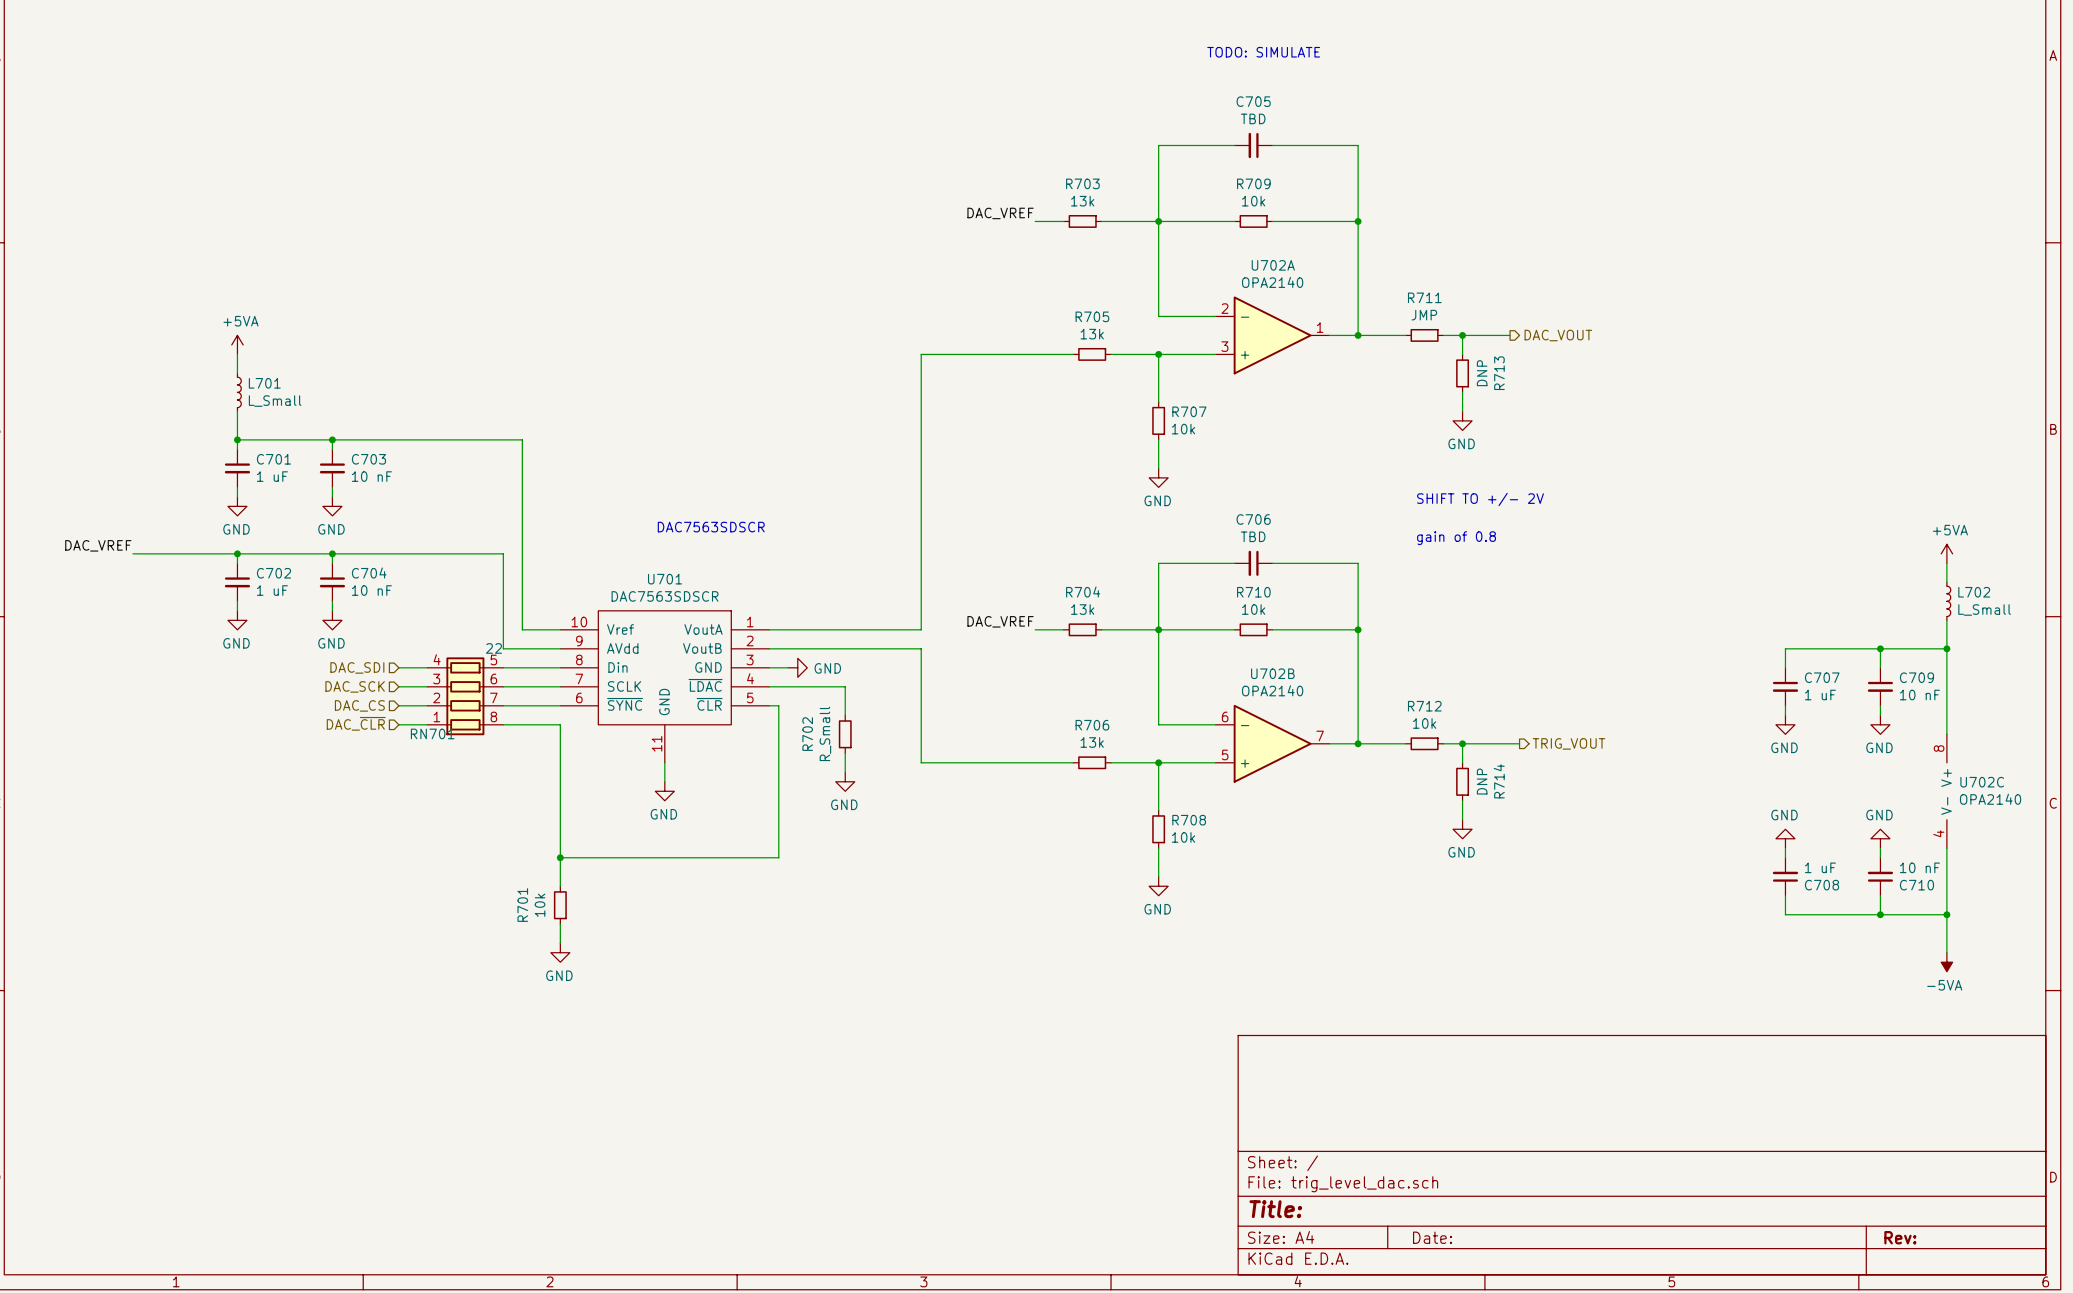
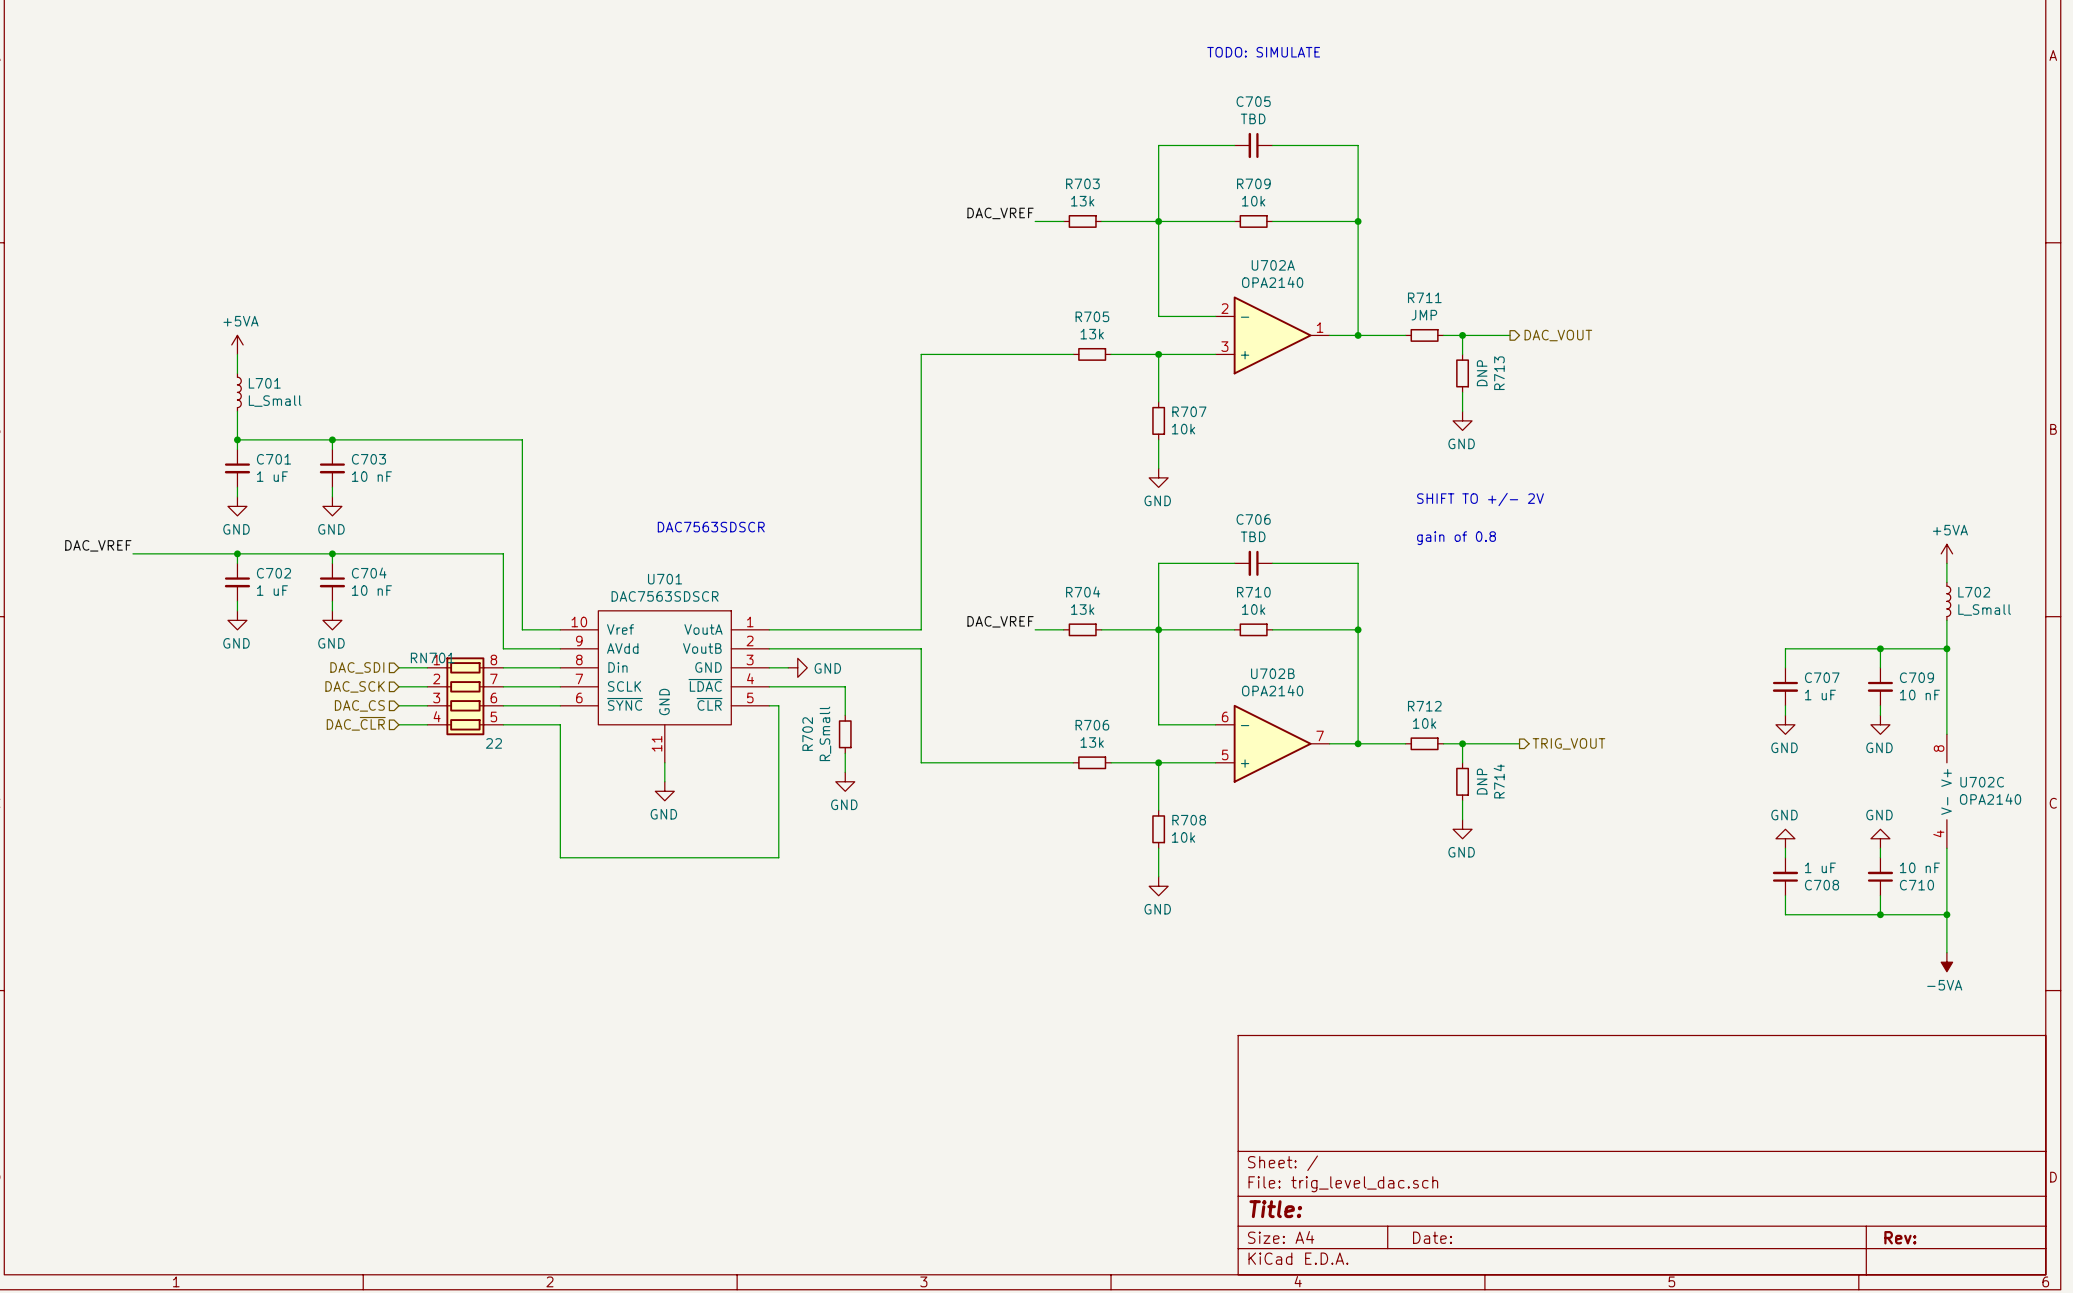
RN701 flip: as is (465, 696) -> up-down (465, 696)
wire: (560, 857) (560, 886) -> none
junction: (560, 857) -> none
R701: 10k (560, 905) -> none
wire: (560, 924) (560, 943) -> none
power symbol: GND (560, 952) -> none

